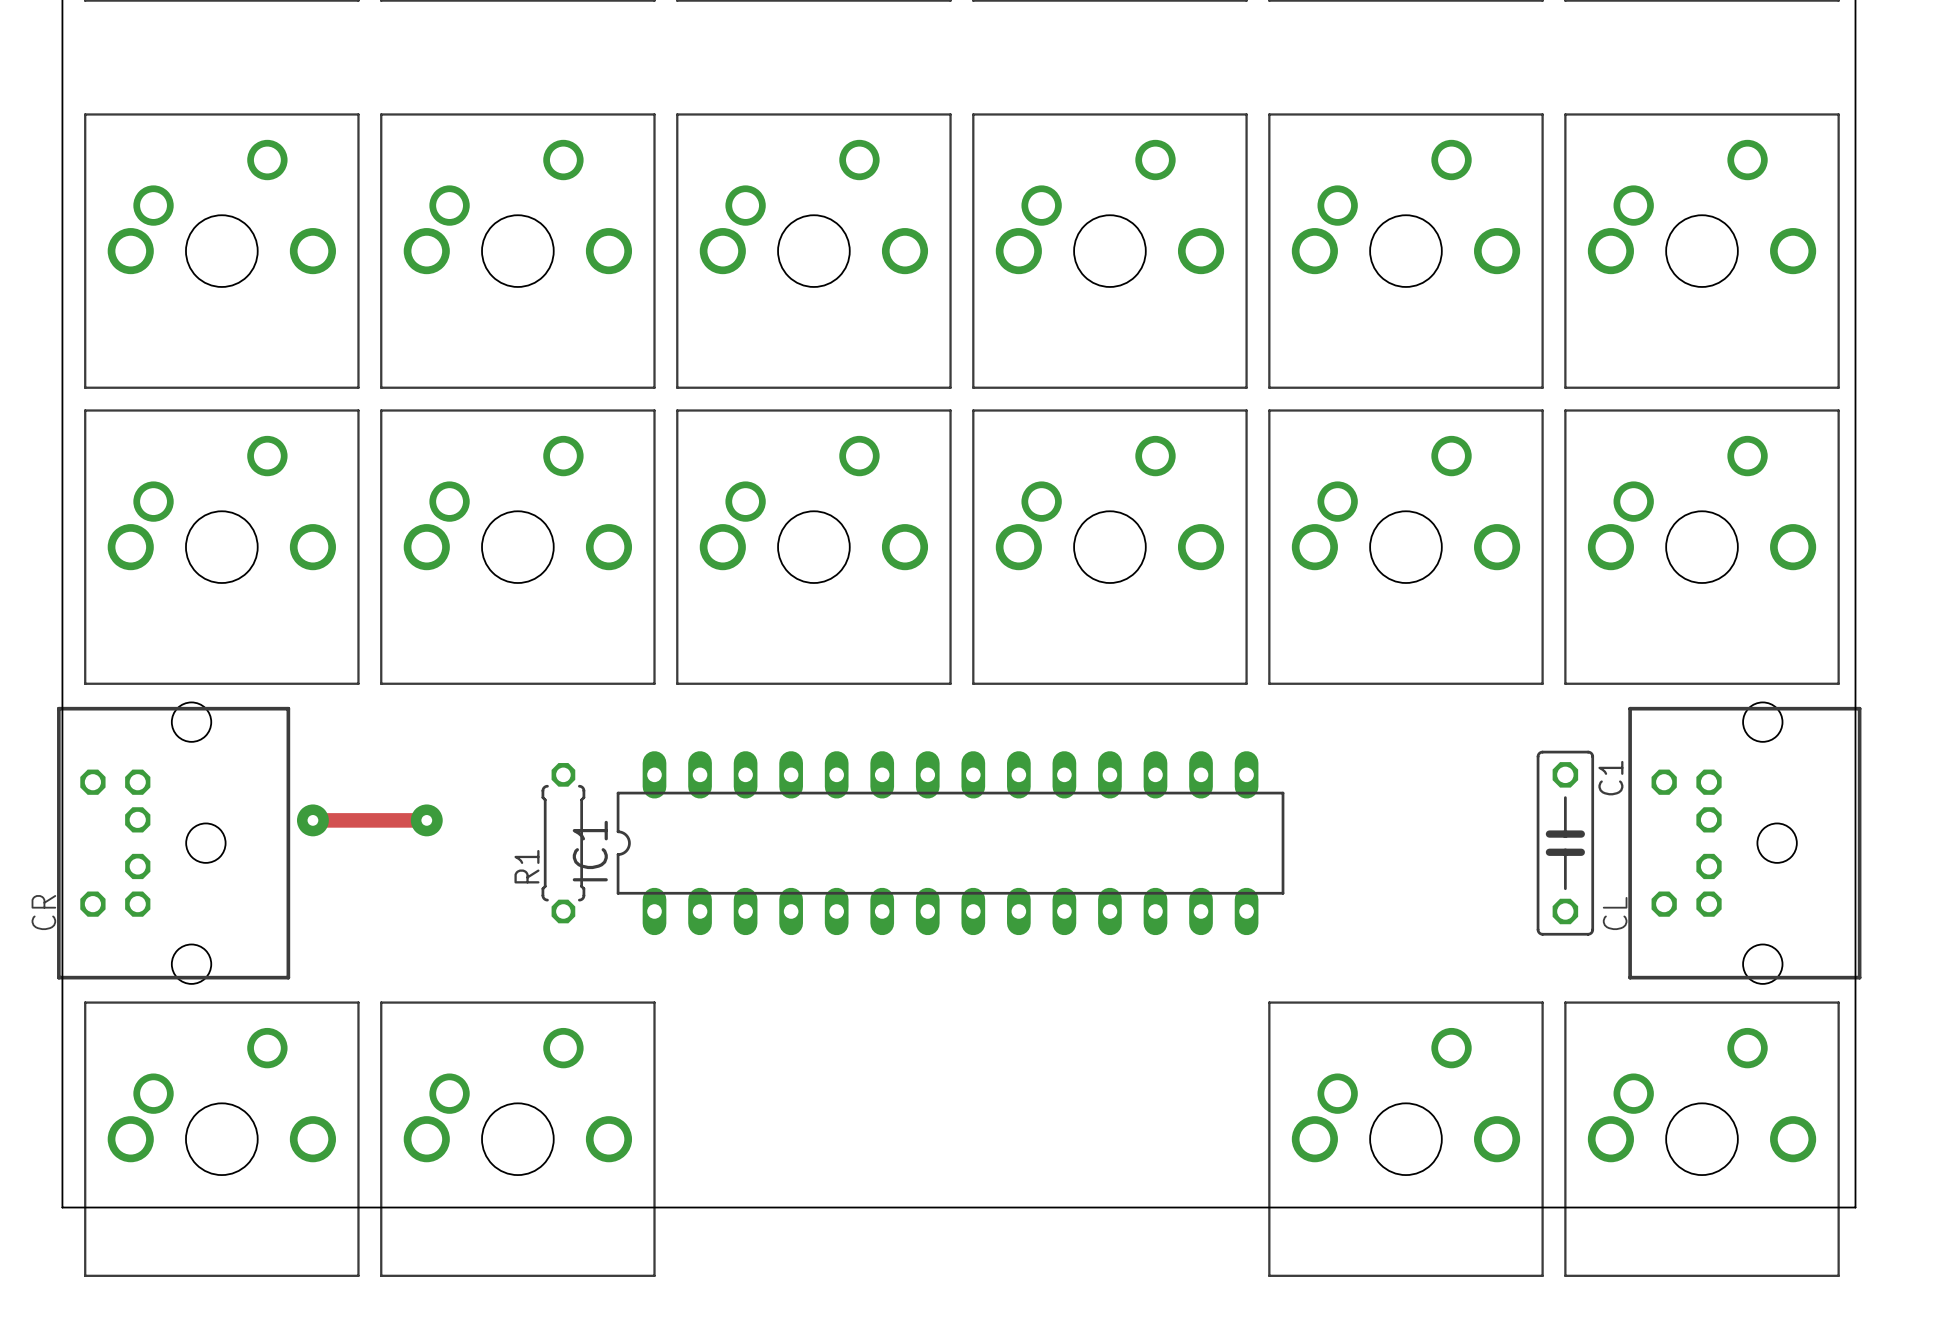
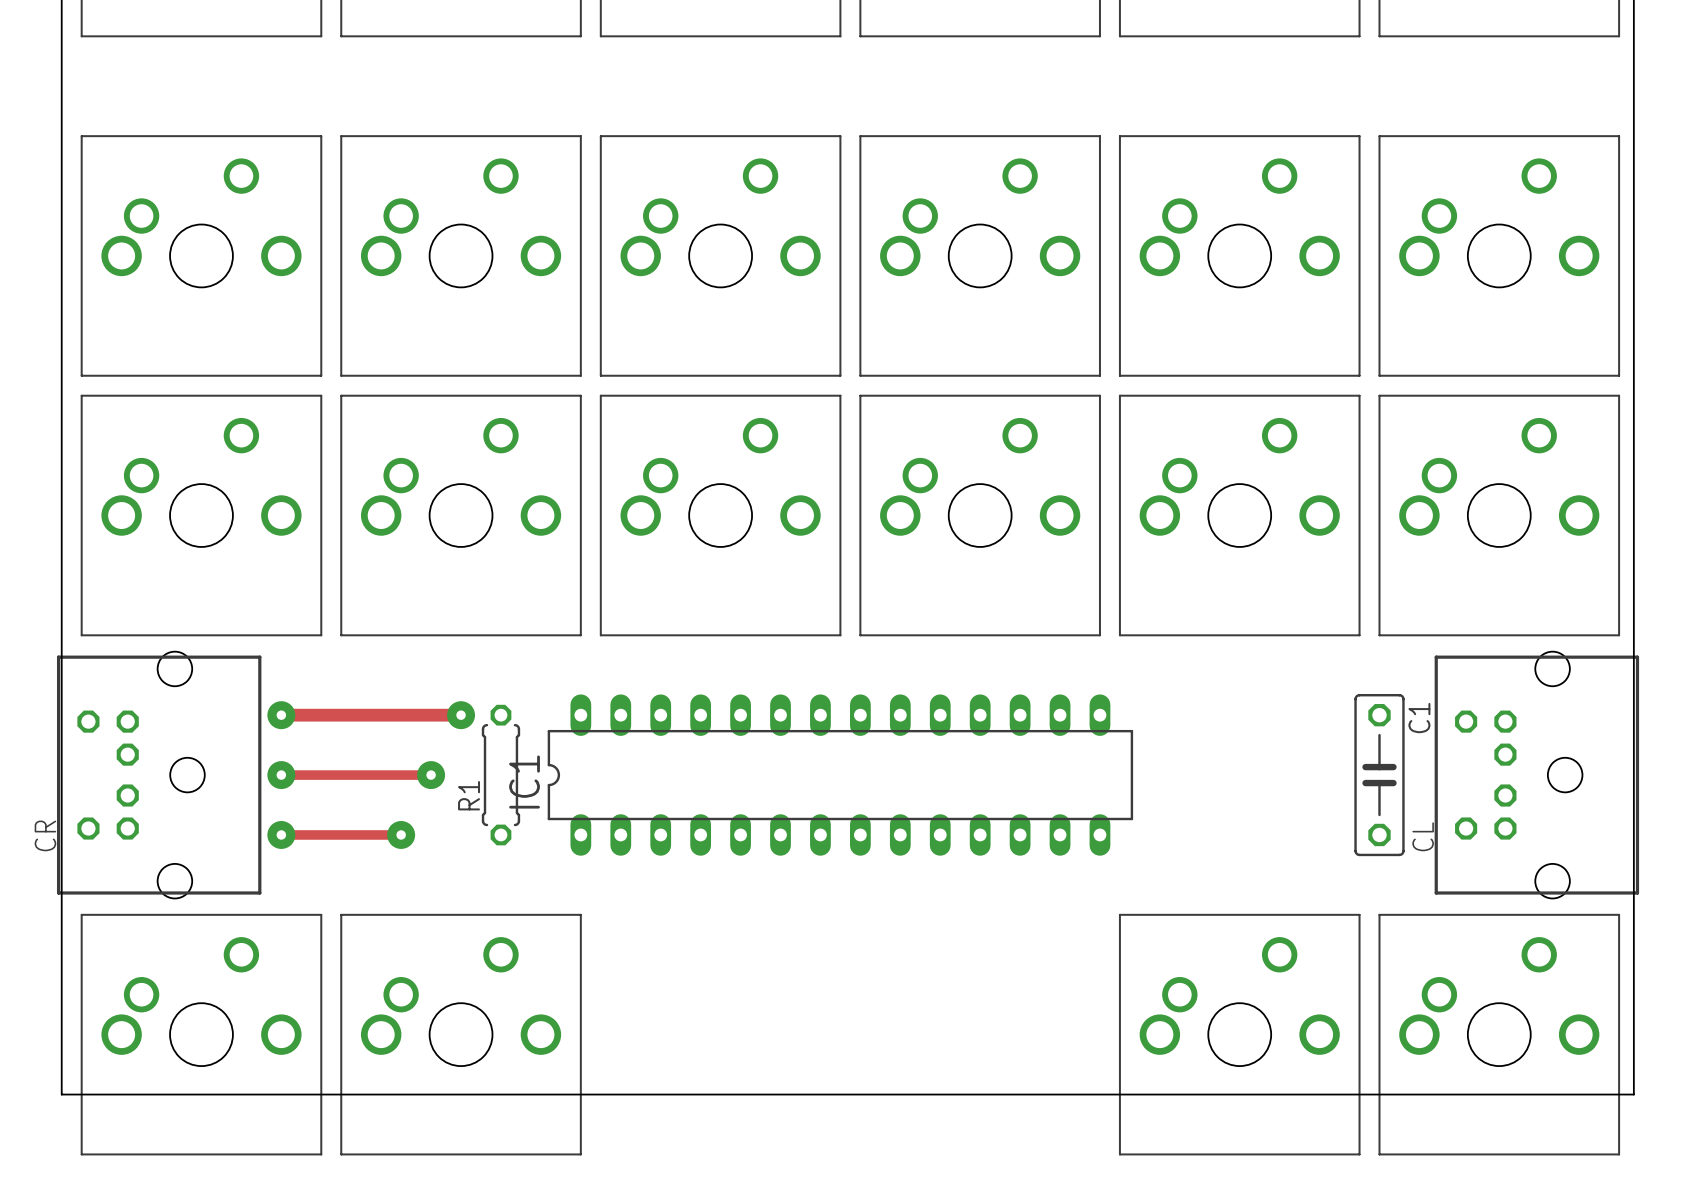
track: none -> (281, 715) (461, 715)
via: none -> (281, 715)
via: none -> (461, 715)
track: (312, 820) (426, 820) -> none
via: (312, 820) -> none
via: (426, 820) -> none
track: none -> (281, 775) (431, 775)
via: none -> (281, 775)
via: none -> (431, 775)
track: none -> (281, 834) (401, 834)
via: none -> (281, 834)
via: none -> (401, 834)

